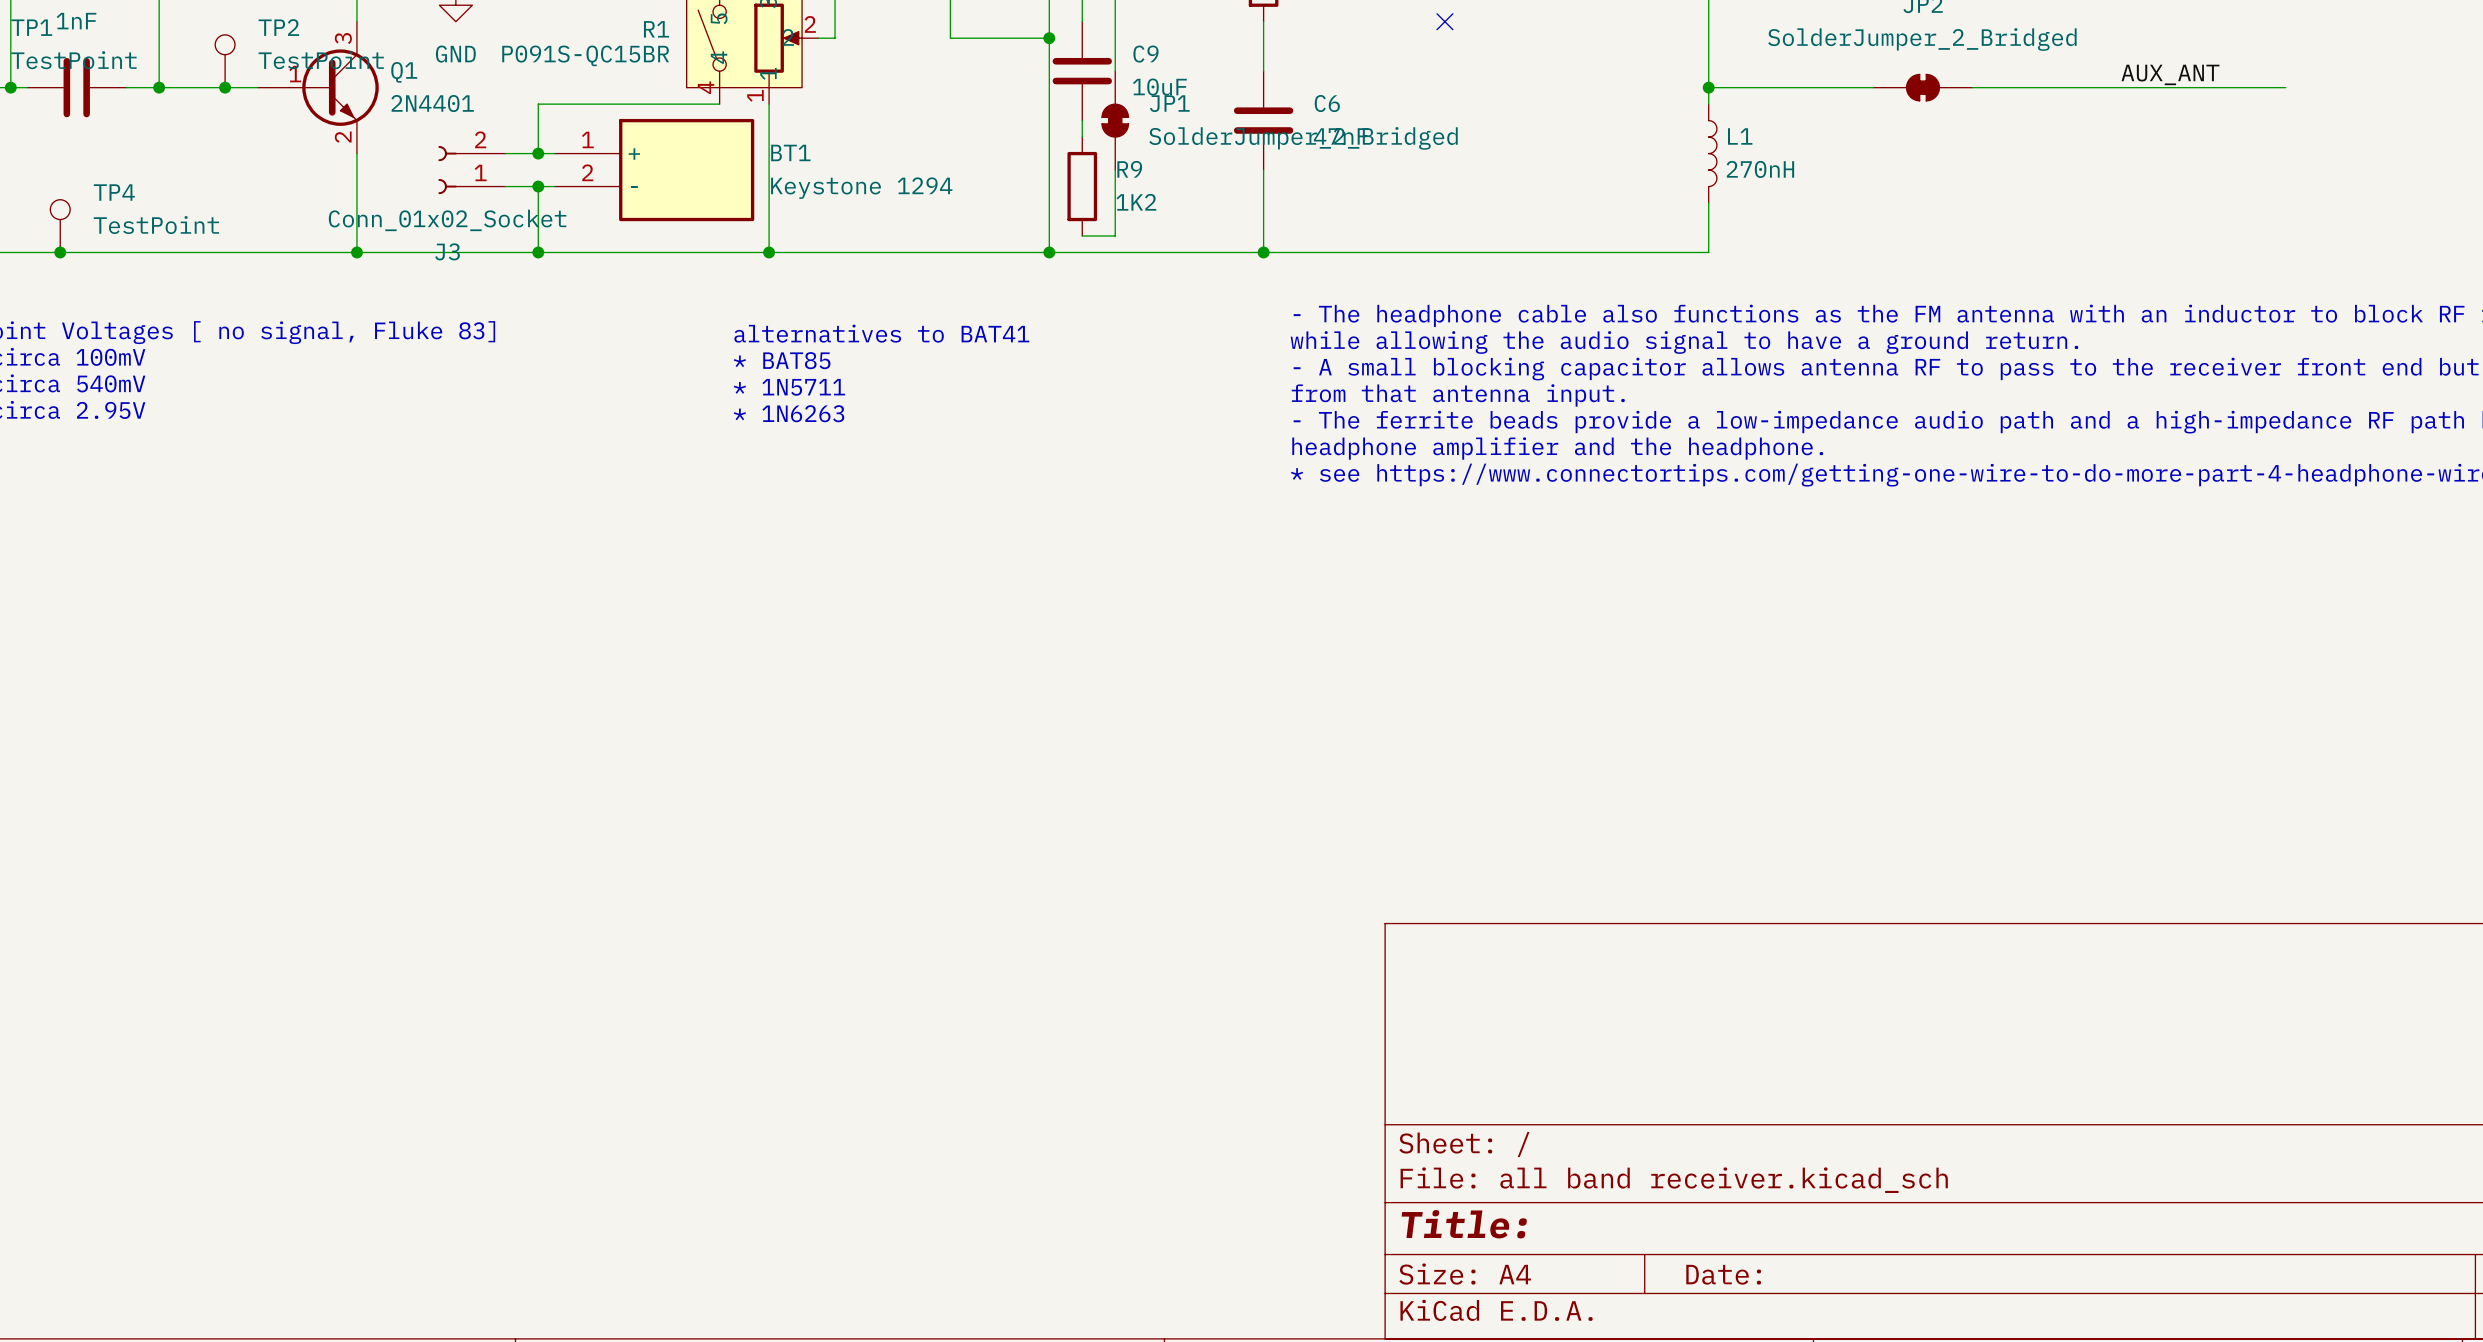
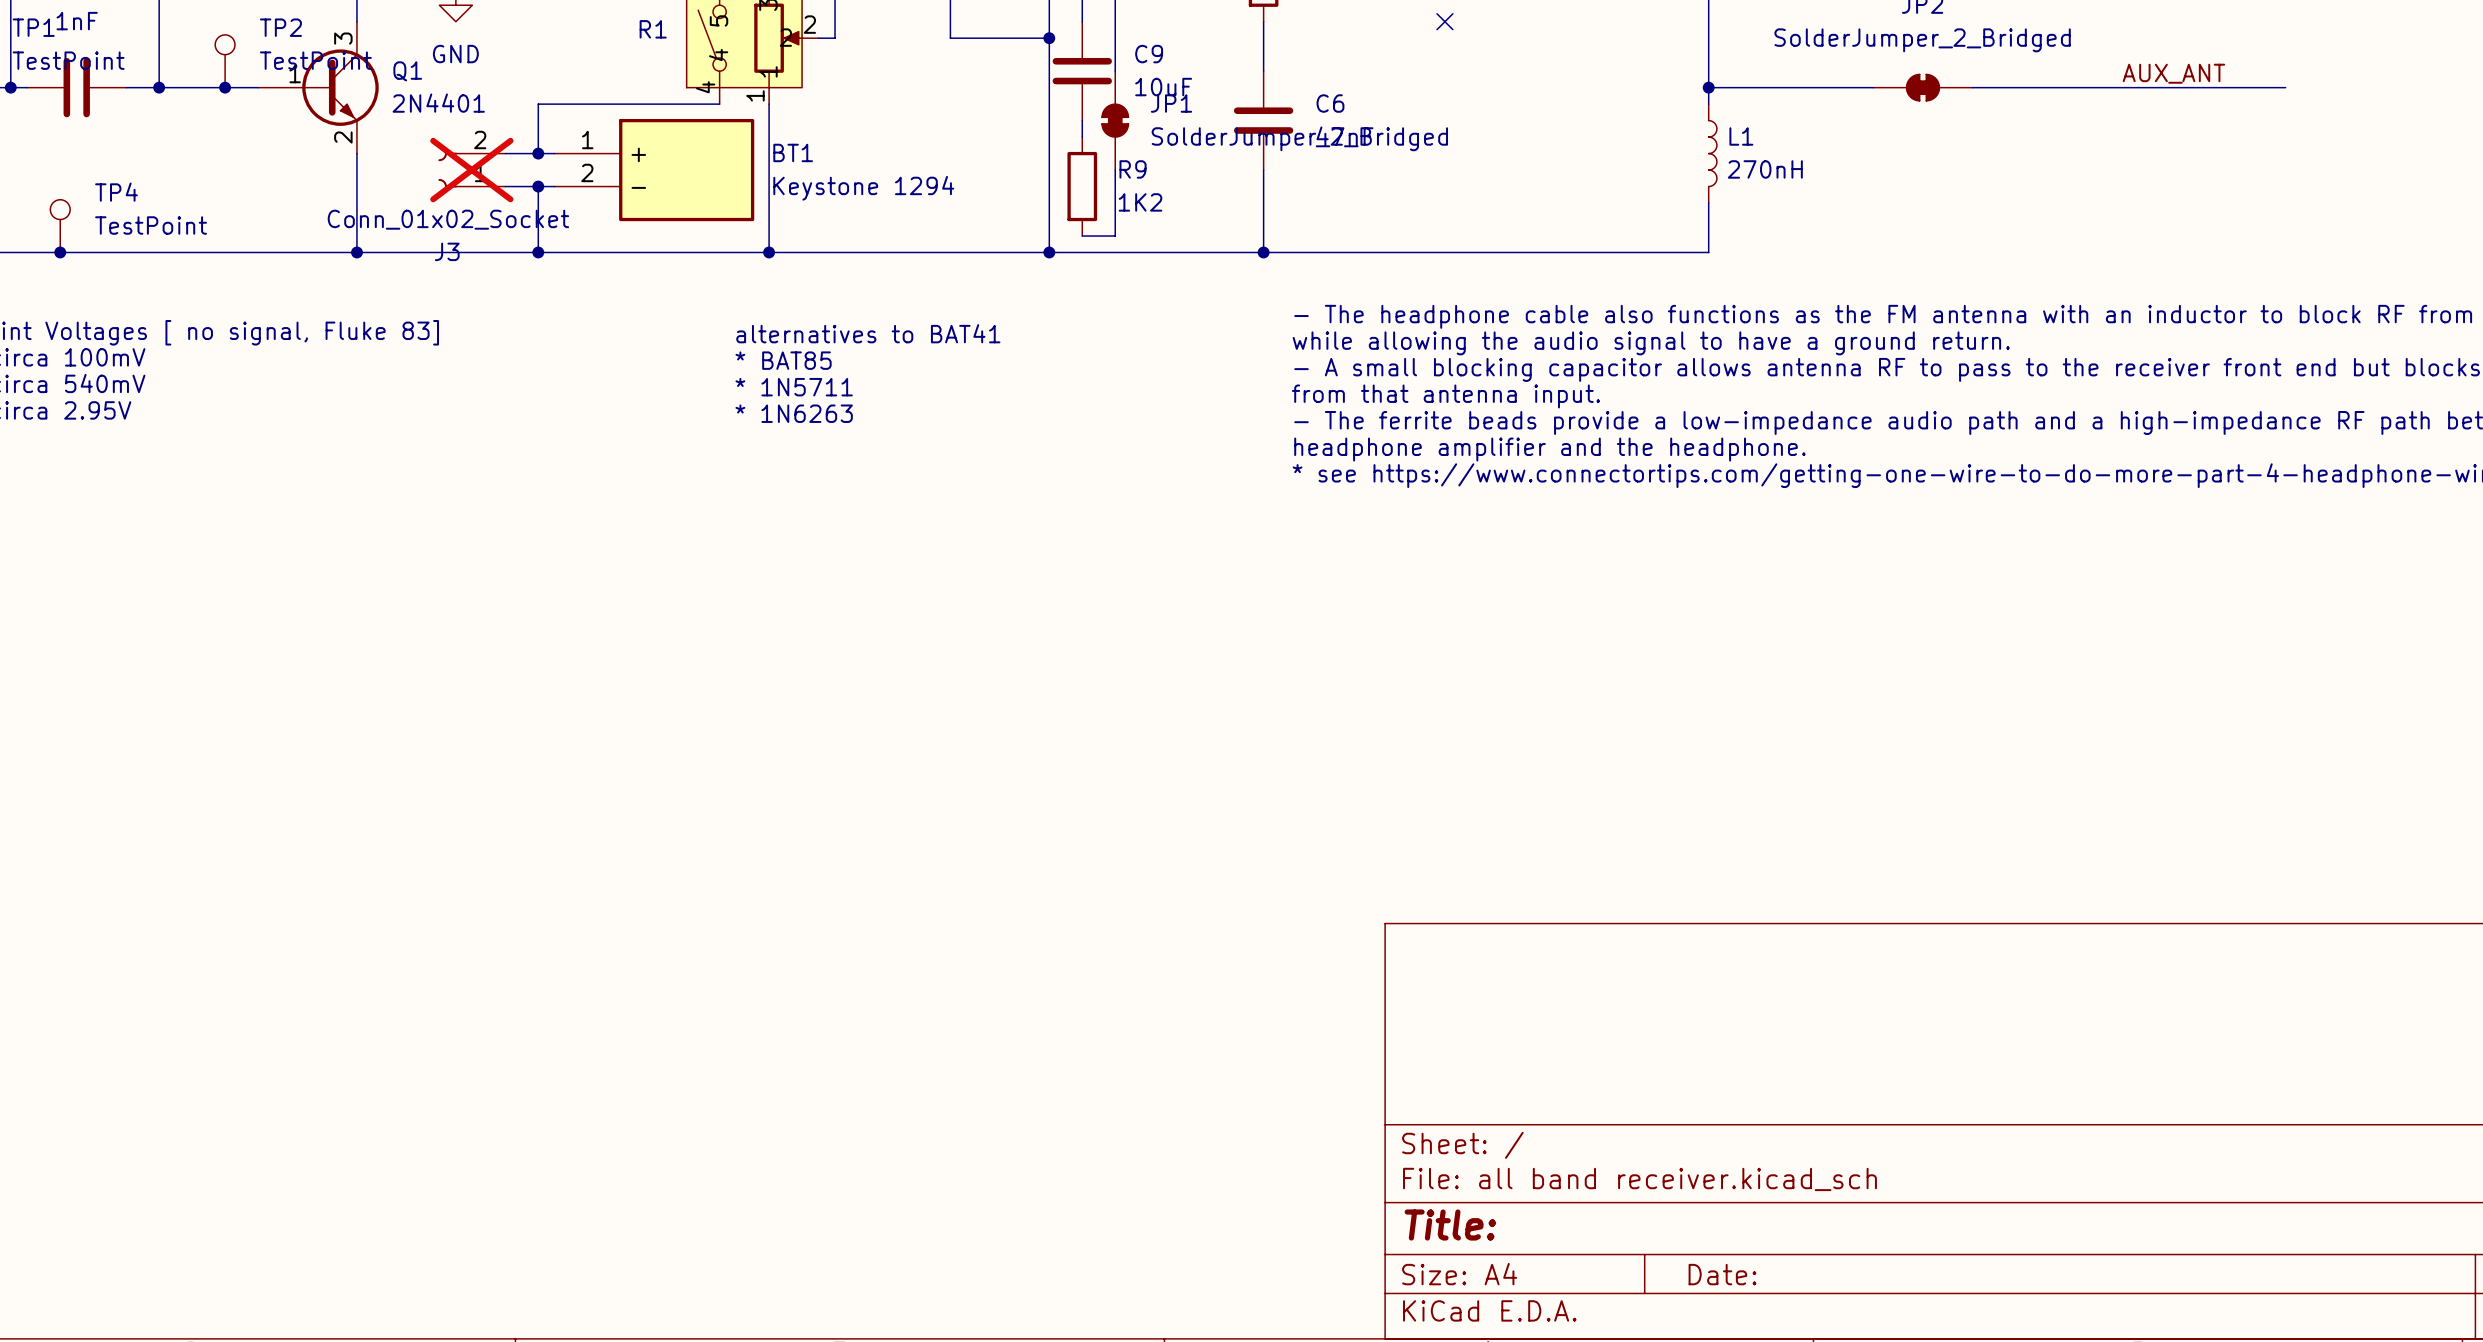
R1 value: P091S-QC15BR (585, 55) -> none
J3 do-not-place cross: none -> (471, 170)

